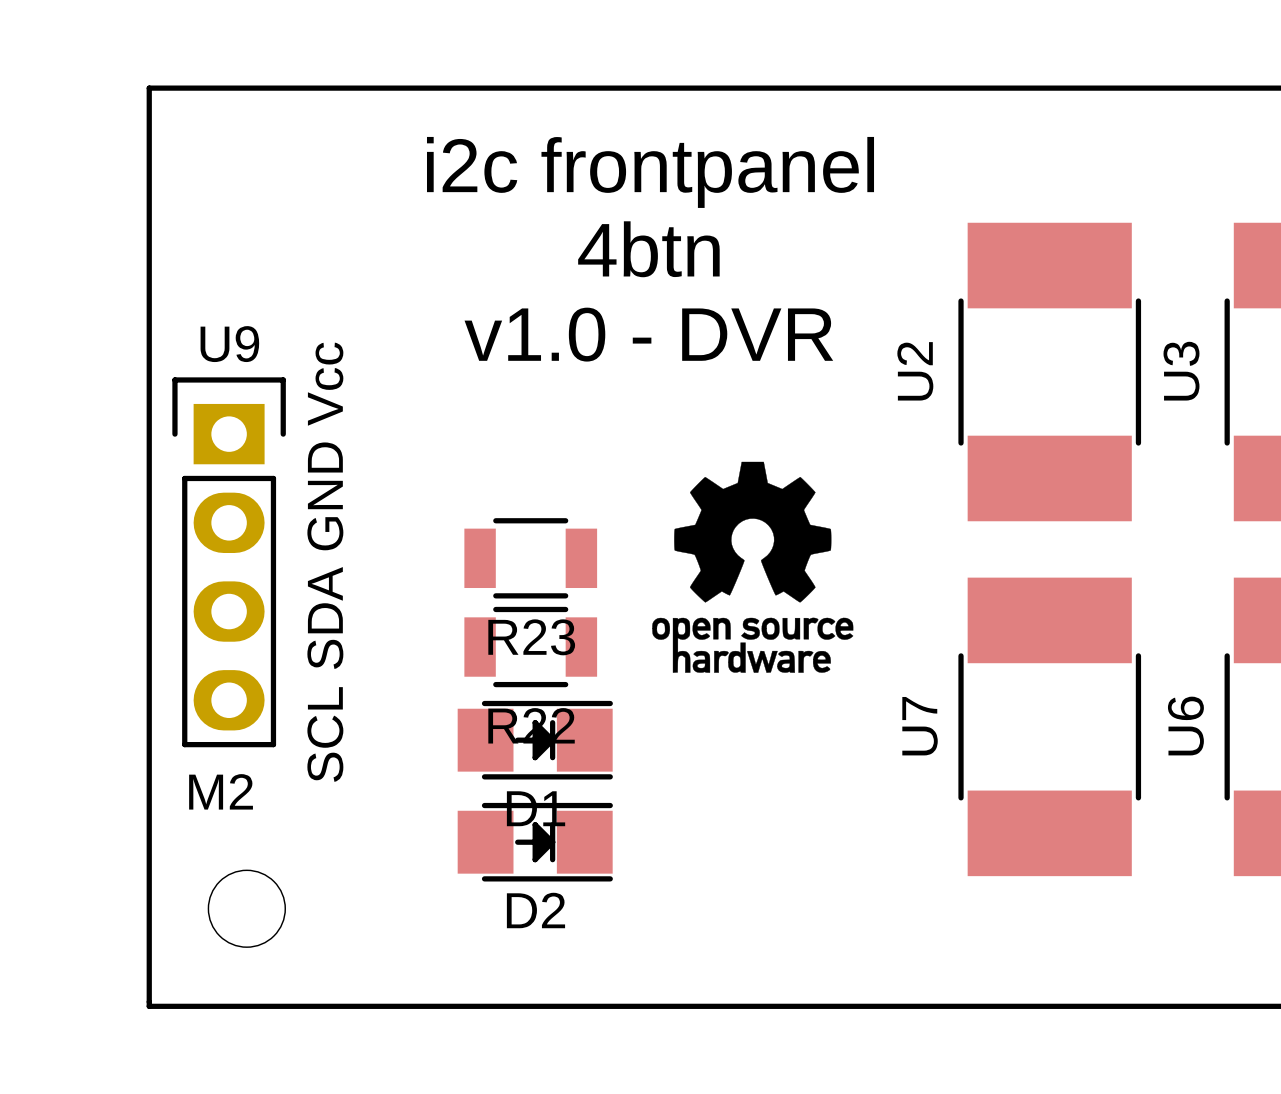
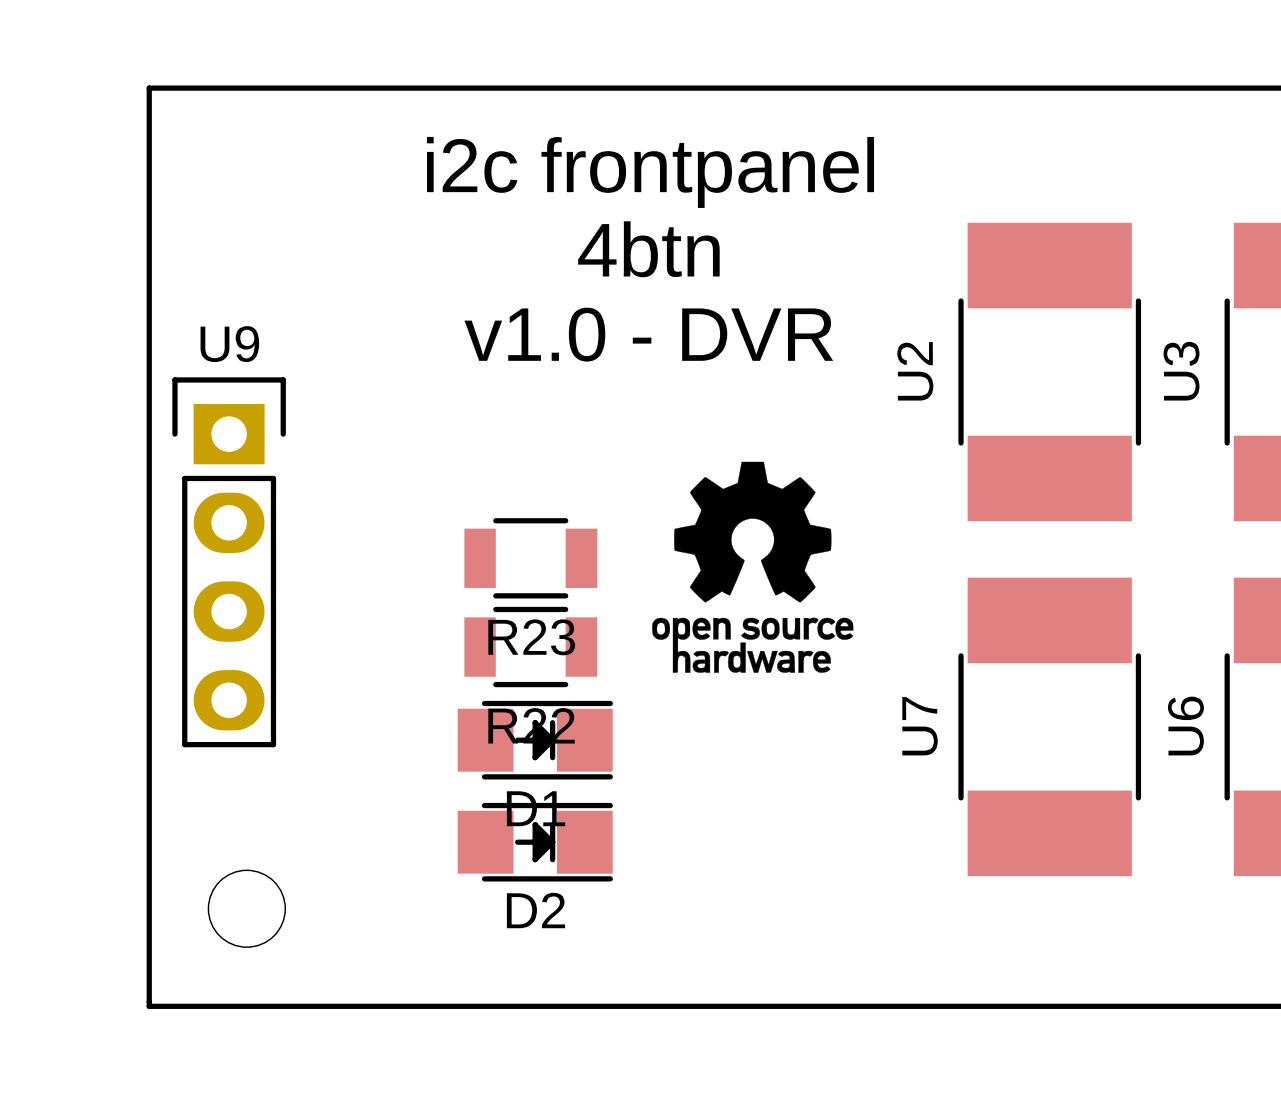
U9 value: SCL SDA GND Vcc (325, 562) -> none
part value: M2 (221, 791) -> none

